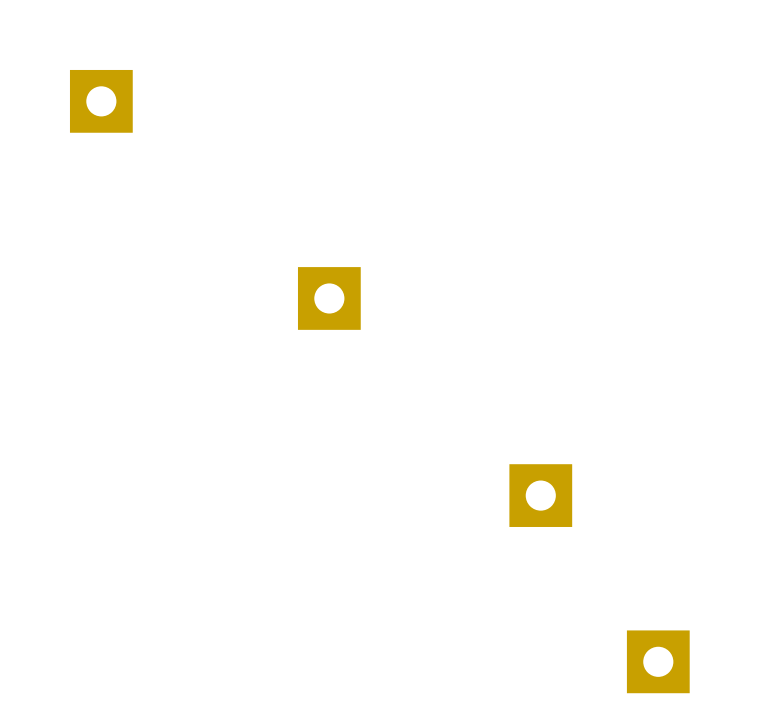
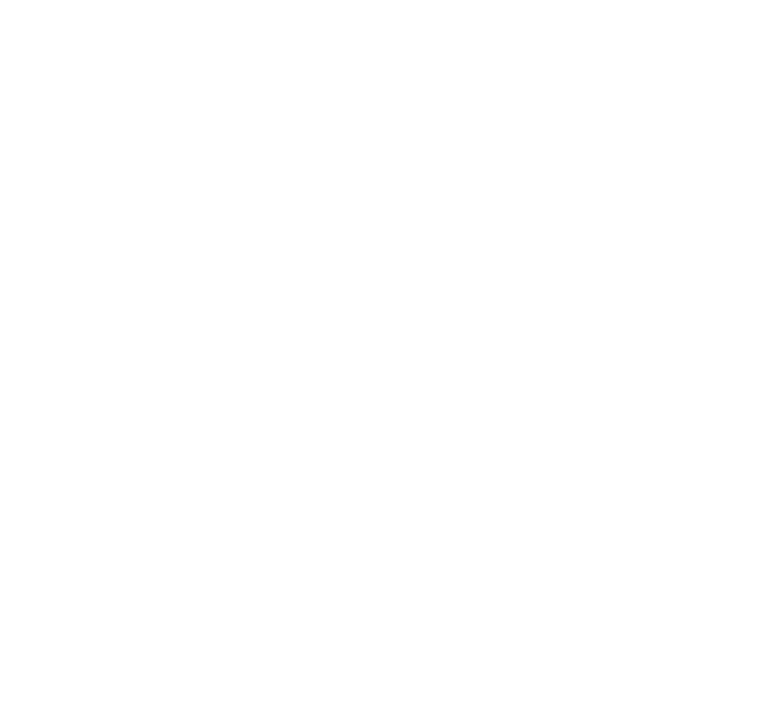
part: (101, 101) -> none
part: (329, 298) -> none
part: (540, 495) -> none
part: (658, 661) -> none

